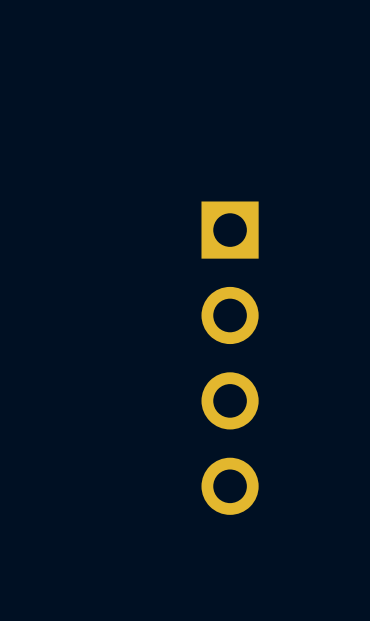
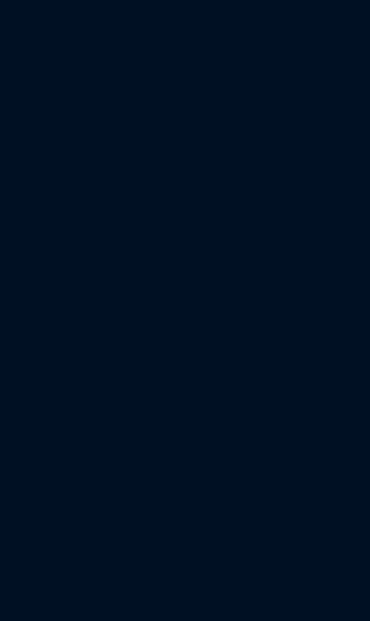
part: (230, 358) -> none

